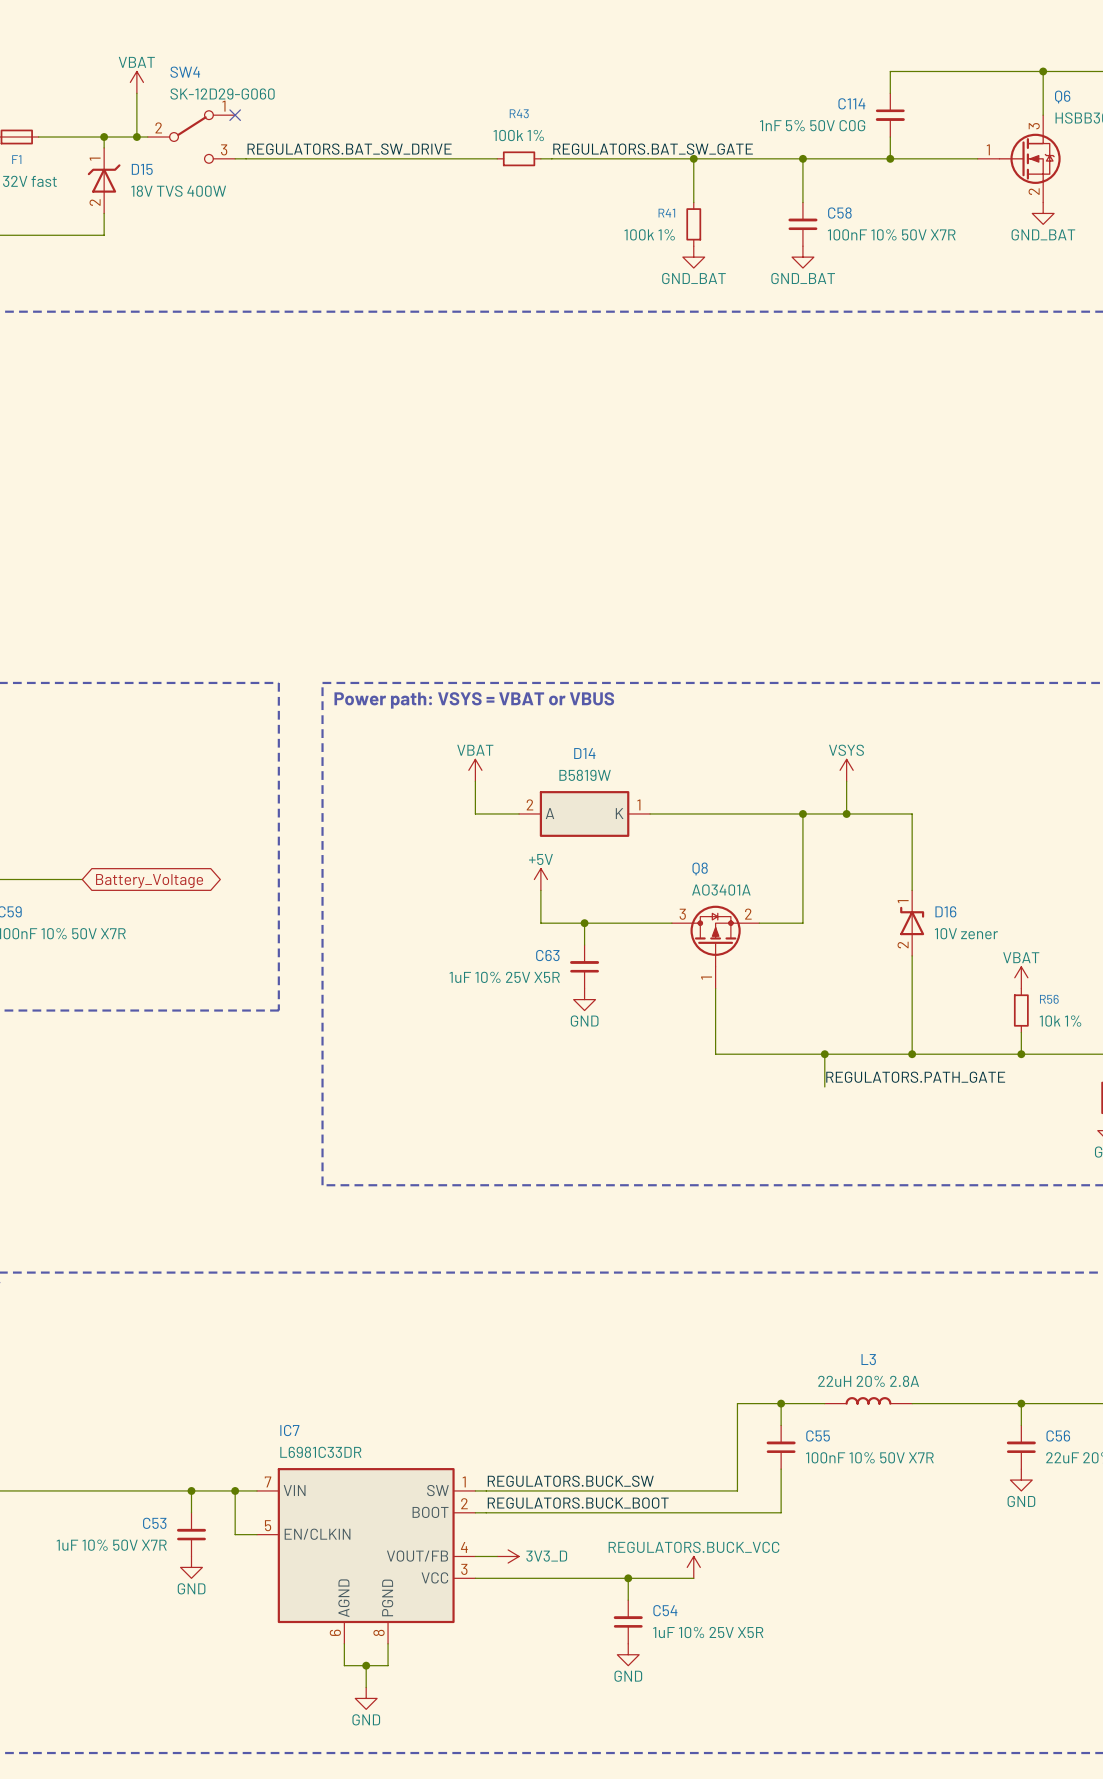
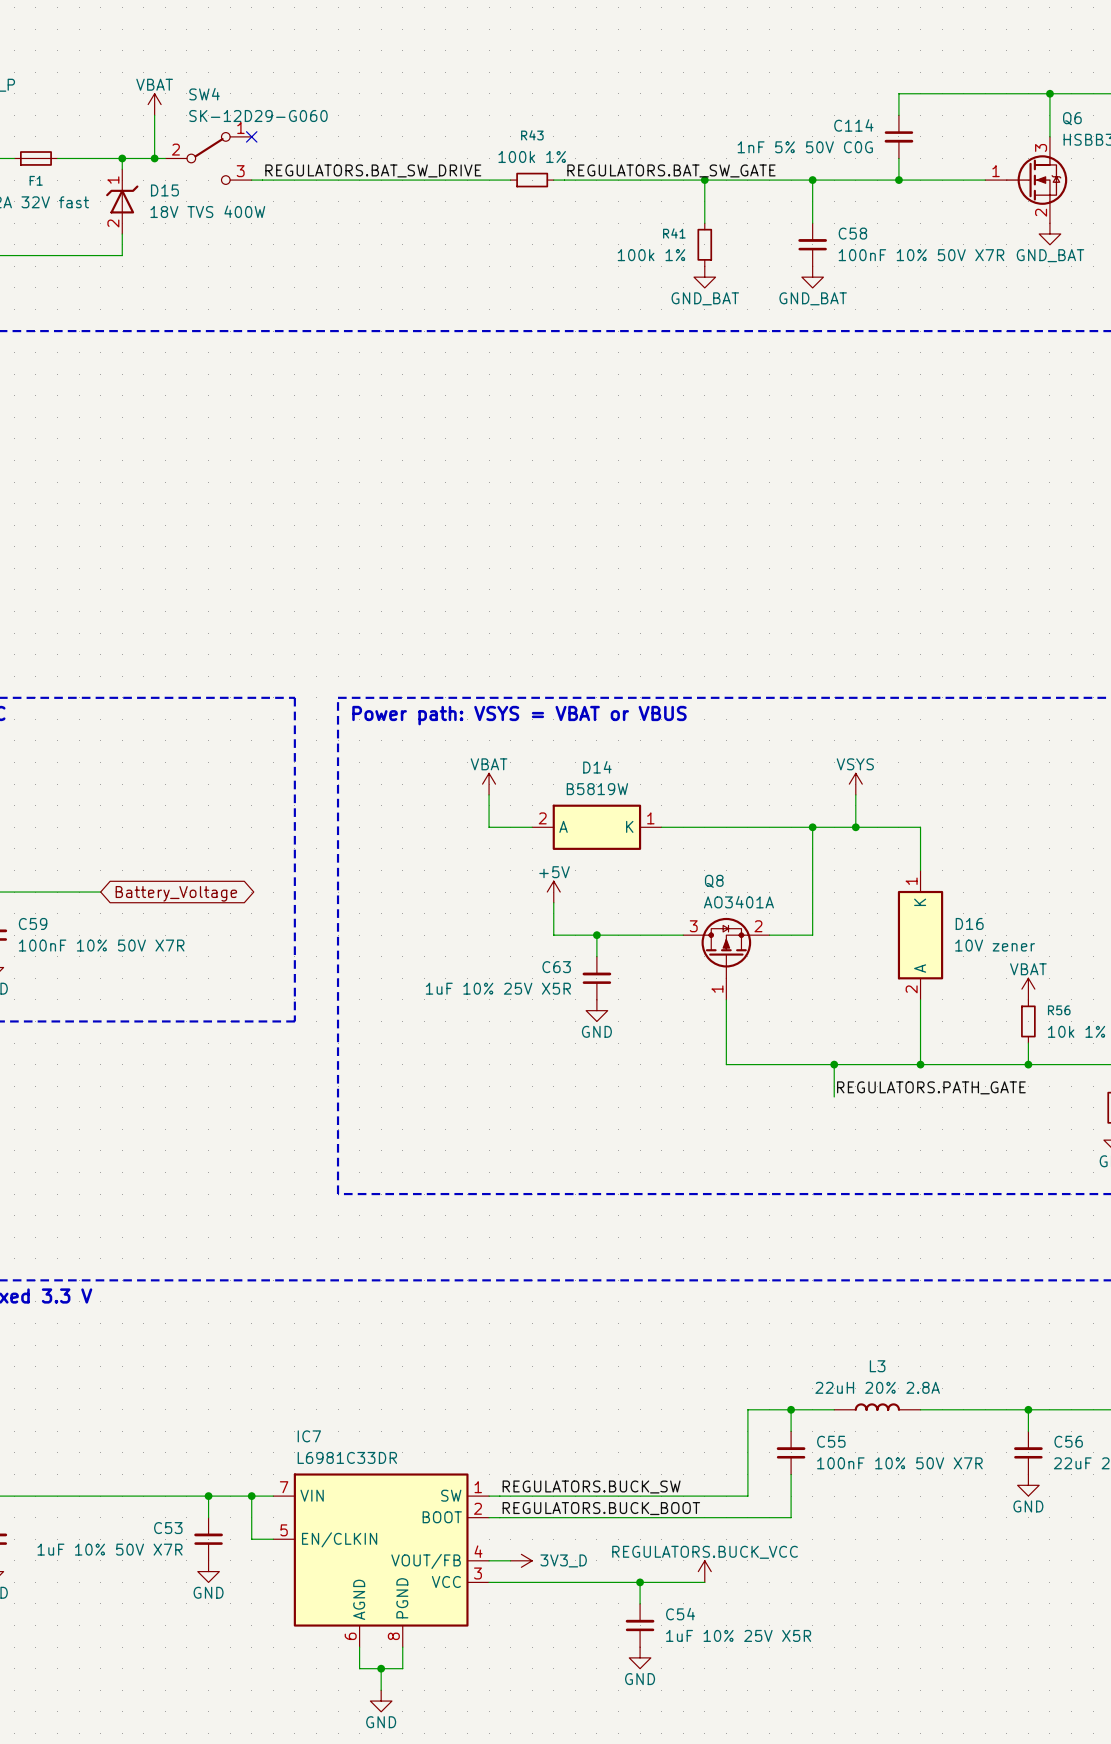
D16 symbol: [900, 890, 925, 956] -> [897, 870, 944, 1000]

